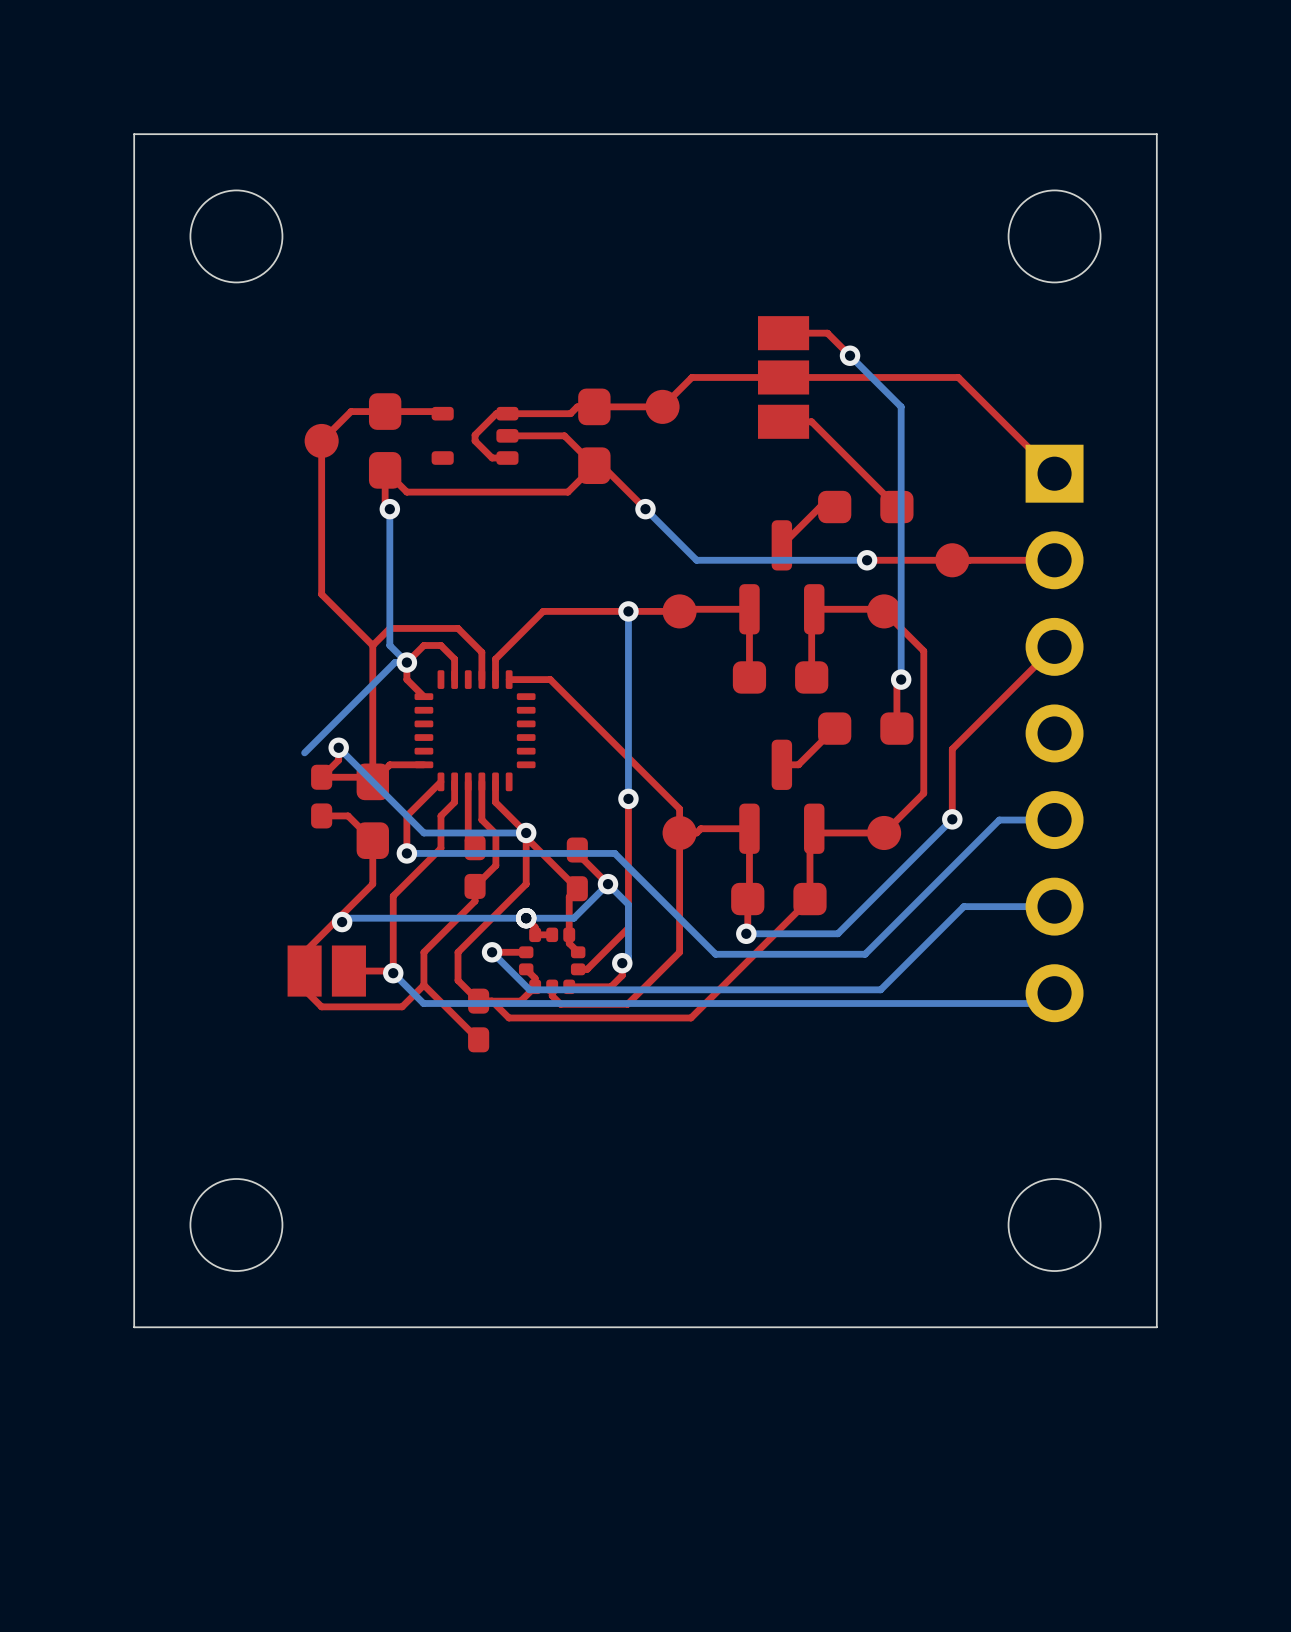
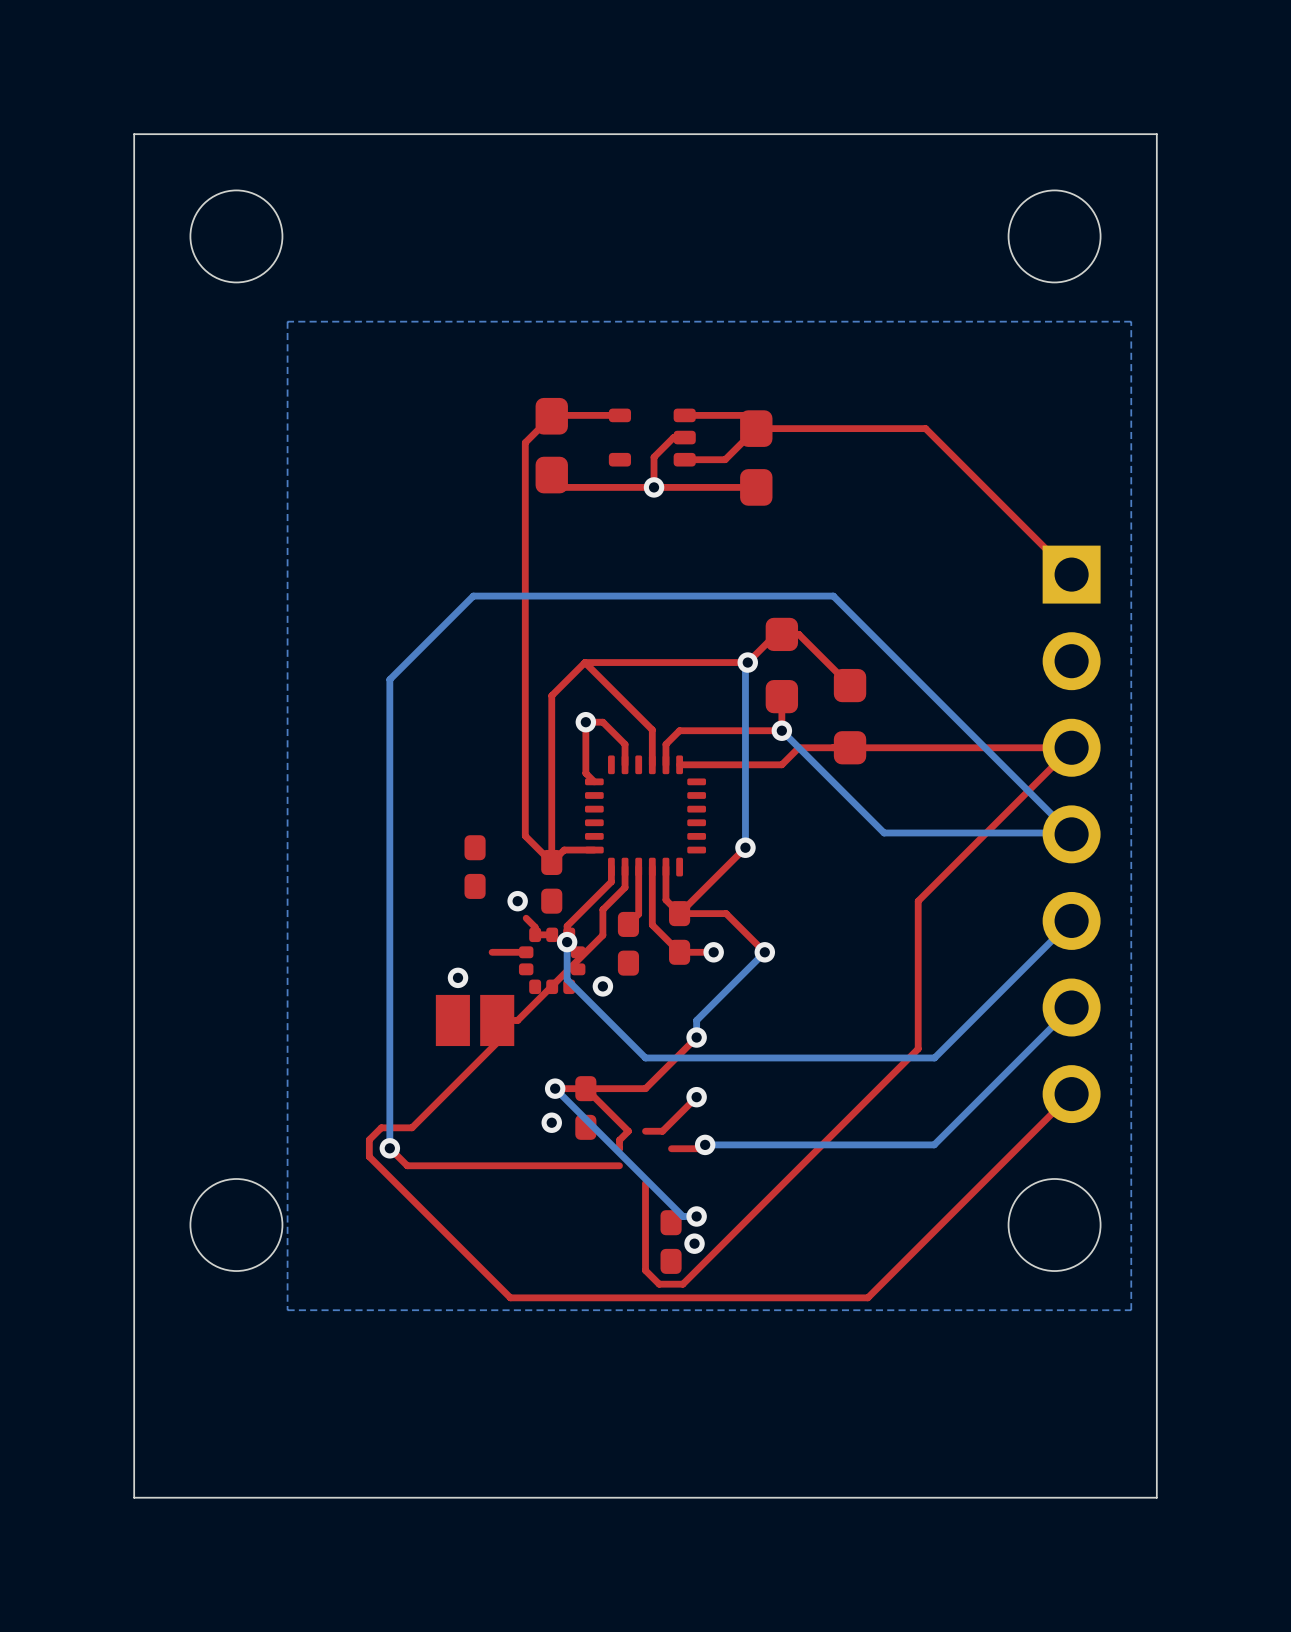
bottom zone outline: none -> (1131, 321) (287, 321) (287, 1310) (1131, 1310) (1131, 321)
top track: (783, 333) (827, 333) (850, 355) -> none
bottom track: (850, 355) (901, 406) (901, 679) -> none
via: (850, 355) -> none
part: (783, 377) -> none
part: (662, 406) -> none
top track: (442, 413) (440, 411) (351, 411) (321, 440) (321, 594) (372, 645) -> none
top track: none -> (619, 415) (552, 415) (525, 442) (525, 836) (551, 862)
top track: none -> (684, 415) (743, 415) (756, 428) (925, 428) (1071, 574)
top track: (783, 421) (811, 421) (896, 507) -> none
top track: none -> (762, 422) (725, 459) (684, 459)
part position: (475, 435) -> (652, 437)
top track: (507, 435) (564, 435) (594, 465) -> none
part position: (594, 436) -> (551, 445)
top track: none -> (684, 437) (673, 437) (654, 457) (654, 487)
part: (321, 440) -> none
part: (385, 440) -> none
top track: (507, 458) (492, 458) (475, 440) (475, 435) (496, 413) (570, 413) (577, 406) (662, 406) (691, 377) (958, 377) (1054, 473) -> none
part: none -> (756, 458)
top track: (594, 465) (567, 492) (406, 492) (385, 470) (385, 504) (389, 509) -> none
top track: (594, 465) (602, 465) (645, 509) -> none
top track: none -> (551, 475) (564, 487) (756, 487)
top track: (834, 507) (820, 507) (781, 545) -> none
part: (865, 507) -> none
bottom track: (389, 509) (389, 645) (406, 662) (394, 662) (304, 752) -> none
via: (389, 509) -> none
bottom track: (645, 509) (696, 560) (867, 560) -> none
via position: (645, 509) -> (654, 487)
via: (867, 560) -> none
part: (952, 560) -> none
top track: (1054, 560) (867, 560) -> none
part: (781, 577) -> none
bottom track: (628, 611) (628, 798) -> none
via: (628, 611) -> none
part: (679, 611) -> none
part: (884, 611) -> none
top track: (372, 645) (372, 781) -> none
top track: (372, 645) (389, 628) (458, 628) (481, 652) (481, 679) -> none
top track: (1054, 646) (952, 749) (952, 819) -> none
via: (406, 662) -> none
top track: none -> (584, 662) (551, 695) (551, 862)
top track: none -> (584, 662) (652, 729) (652, 764)
top track: none -> (584, 662) (747, 662) (775, 634) (798, 634) (850, 685)
bottom track: none -> (747, 662) (745, 664) (745, 847) (750, 847) (747, 845)
via: none -> (747, 662)
top track: (749, 677) (749, 609) (681, 609) (679, 611) (543, 611) (495, 659) (495, 679) -> none
part rotation: 0° (780, 677) -> 90° clockwise (781, 665)
top track: (811, 677) (811, 611) (814, 609) (881, 609) (923, 651) (923, 793) (884, 832) (818, 832) (814, 828) (809, 832) (809, 899) (691, 1017) (508, 1017) (492, 1001) -> none
top track: (454, 679) (454, 659) (440, 645) (423, 645) (406, 662) (406, 679) (423, 696) -> none
top track: (509, 679) (550, 679) (679, 808) (679, 952) (627, 1004) (560, 1004) (552, 995) (552, 986) -> none
top track: (901, 679) (896, 683) (896, 728) -> none
via: (901, 679) -> none
top track: none -> (781, 696) (781, 730) (679, 730) (665, 744) (665, 764)
via: none -> (585, 722)
top track: (834, 728) (798, 764) (781, 764) -> none
part rotation: 0° (865, 728) -> 90° clockwise (850, 716)
part position: (475, 730) -> (645, 815)
bottom track: none -> (781, 730) (884, 832) (1070, 832)
via: none -> (781, 730)
part position: (1054, 733) -> (1071, 834)
top track: (338, 747) (338, 760) (321, 777) (368, 777) (372, 781) -> none
bottom track: (338, 747) (423, 832) (526, 832) -> none
via: (338, 747) -> none
top track: (423, 764) (389, 764) (372, 781) -> none
top track: none -> (625, 764) (625, 744) (602, 722) (585, 722) (585, 773) (594, 781)
top track: none -> (679, 764) (781, 764) (798, 747) (1071, 747) (918, 901) (918, 1048) (682, 1284) (659, 1284) (645, 1270) (645, 1183)
top track: (440, 781) (406, 815) (406, 853) -> none
top track: (454, 781) (454, 802) (440, 815) (440, 848) (393, 896) (393, 973) (391, 971) (348, 971) (348, 966) -> none
top track: (468, 781) (468, 840) (475, 847) -> none
top track: (481, 781) (481, 819) (495, 833) (495, 865) (471, 890) -> none
top track: (495, 781) (495, 802) (526, 832) (526, 884) (458, 952) (458, 980) (478, 1001) (520, 1001) (535, 986) (535, 978) (526, 969) -> none
part: (321, 796) -> none
part: (781, 796) -> none
top track: (628, 798) (628, 928) (587, 969) (578, 969) -> none
via: (628, 798) -> none
part: (372, 811) -> none
top track: (321, 815) (348, 815) (372, 840) (372, 884) (342, 914) (342, 922) (334, 922) (304, 952) (304, 989) (321, 1006) (402, 1006) (423, 985) -> none
bottom track: (952, 819) (837, 933) (746, 933) -> none
via: (952, 819) -> none
bottom track: (1054, 820) (999, 820) (865, 954) (715, 954) (614, 853) (406, 853) -> none
via: (526, 832) -> none
top track: (679, 832) (696, 832) (700, 828) (749, 828) (749, 897) (747, 899) (746, 933) -> none
part: (679, 832) -> none
part: (884, 832) -> none
bottom track: none -> (1071, 834) (833, 596) (473, 596) (389, 679) (389, 1148)
top track: (526, 837) (577, 888) (569, 896) (569, 943) (578, 952) -> none
top track: none -> (745, 847) (679, 913)
via: none -> (745, 847)
top track: (577, 850) (577, 853) (608, 884) -> none
top track: none -> (594, 850) (564, 850) (551, 862)
via: (406, 853) -> none
top track: none -> (611, 867) (611, 881) (567, 926) (567, 942)
top track: none -> (625, 867) (625, 887) (602, 909) (602, 935) (517, 1020) (497, 1020) (497, 1042) (412, 1127) (381, 1127) (369, 1139) (369, 1156) (510, 1297) (867, 1297) (1071, 1094)
top track: none -> (638, 867) (638, 914) (628, 924)
top track: none -> (652, 867) (652, 925) (679, 952) (713, 952)
top track: none -> (665, 867) (665, 899) (679, 913)
part position: (577, 869) -> (551, 881)
via: (608, 884) -> none
top track: (475, 886) (475, 901) (423, 952) (423, 985) -> none
part: (778, 899) -> none
bottom track: (1054, 906) (963, 906) (880, 989) (529, 989) (492, 952) -> none
top track: none -> (679, 913) (726, 913) (764, 952)
via position: (526, 918) -> (517, 901)
bottom track: none -> (1071, 920) (934, 1057) (645, 1057) (567, 979) (567, 942)
bottom track: (342, 922) (345, 918) (573, 918) (608, 884) (628, 904) (628, 957) (622, 963) -> none
via: (342, 922) -> none
part: none -> (679, 932)
via position: (746, 933) -> (764, 952)
via: none -> (567, 942)
part: none -> (628, 943)
via: (492, 952) -> none
via: none -> (713, 952)
bottom track: none -> (764, 952) (696, 1020) (696, 1037)
top track: (622, 963) (622, 975) (610, 986) (569, 986) -> none
via: (622, 963) -> none
part: (326, 971) -> none
bottom track: (393, 973) (423, 1003) (1044, 1003) (1054, 993) -> none
via: (393, 973) -> none
via: none -> (458, 977)
top track: (423, 985) (478, 1039) -> none
via: none -> (602, 986)
part footprint: [468, 988, 490, 1053] -> [435, 994, 515, 1047]
bottom track: none -> (1071, 1007) (934, 1144) (705, 1144)
top track: none -> (696, 1037) (645, 1088) (555, 1088)
via: none -> (696, 1037)
bottom track: none -> (555, 1088) (683, 1216) (696, 1216)
via: none -> (555, 1088)
top track: none -> (585, 1088) (628, 1131) (619, 1140) (619, 1148)
top track: none -> (696, 1097) (662, 1131) (645, 1131)
via: none -> (696, 1097)
part: none -> (585, 1108)
via: none -> (551, 1122)
top track: none -> (705, 1144) (701, 1148) (671, 1148)
via: none -> (705, 1144)
top track: none -> (389, 1148) (407, 1165) (619, 1165)
via: none -> (389, 1148)
via: none -> (696, 1216)
part: none -> (671, 1242)
via: none -> (694, 1243)
board edge: (1156, 1327) (134, 1327) -> (1156, 1327) (1156, 1497) (134, 1497) (134, 1327)

